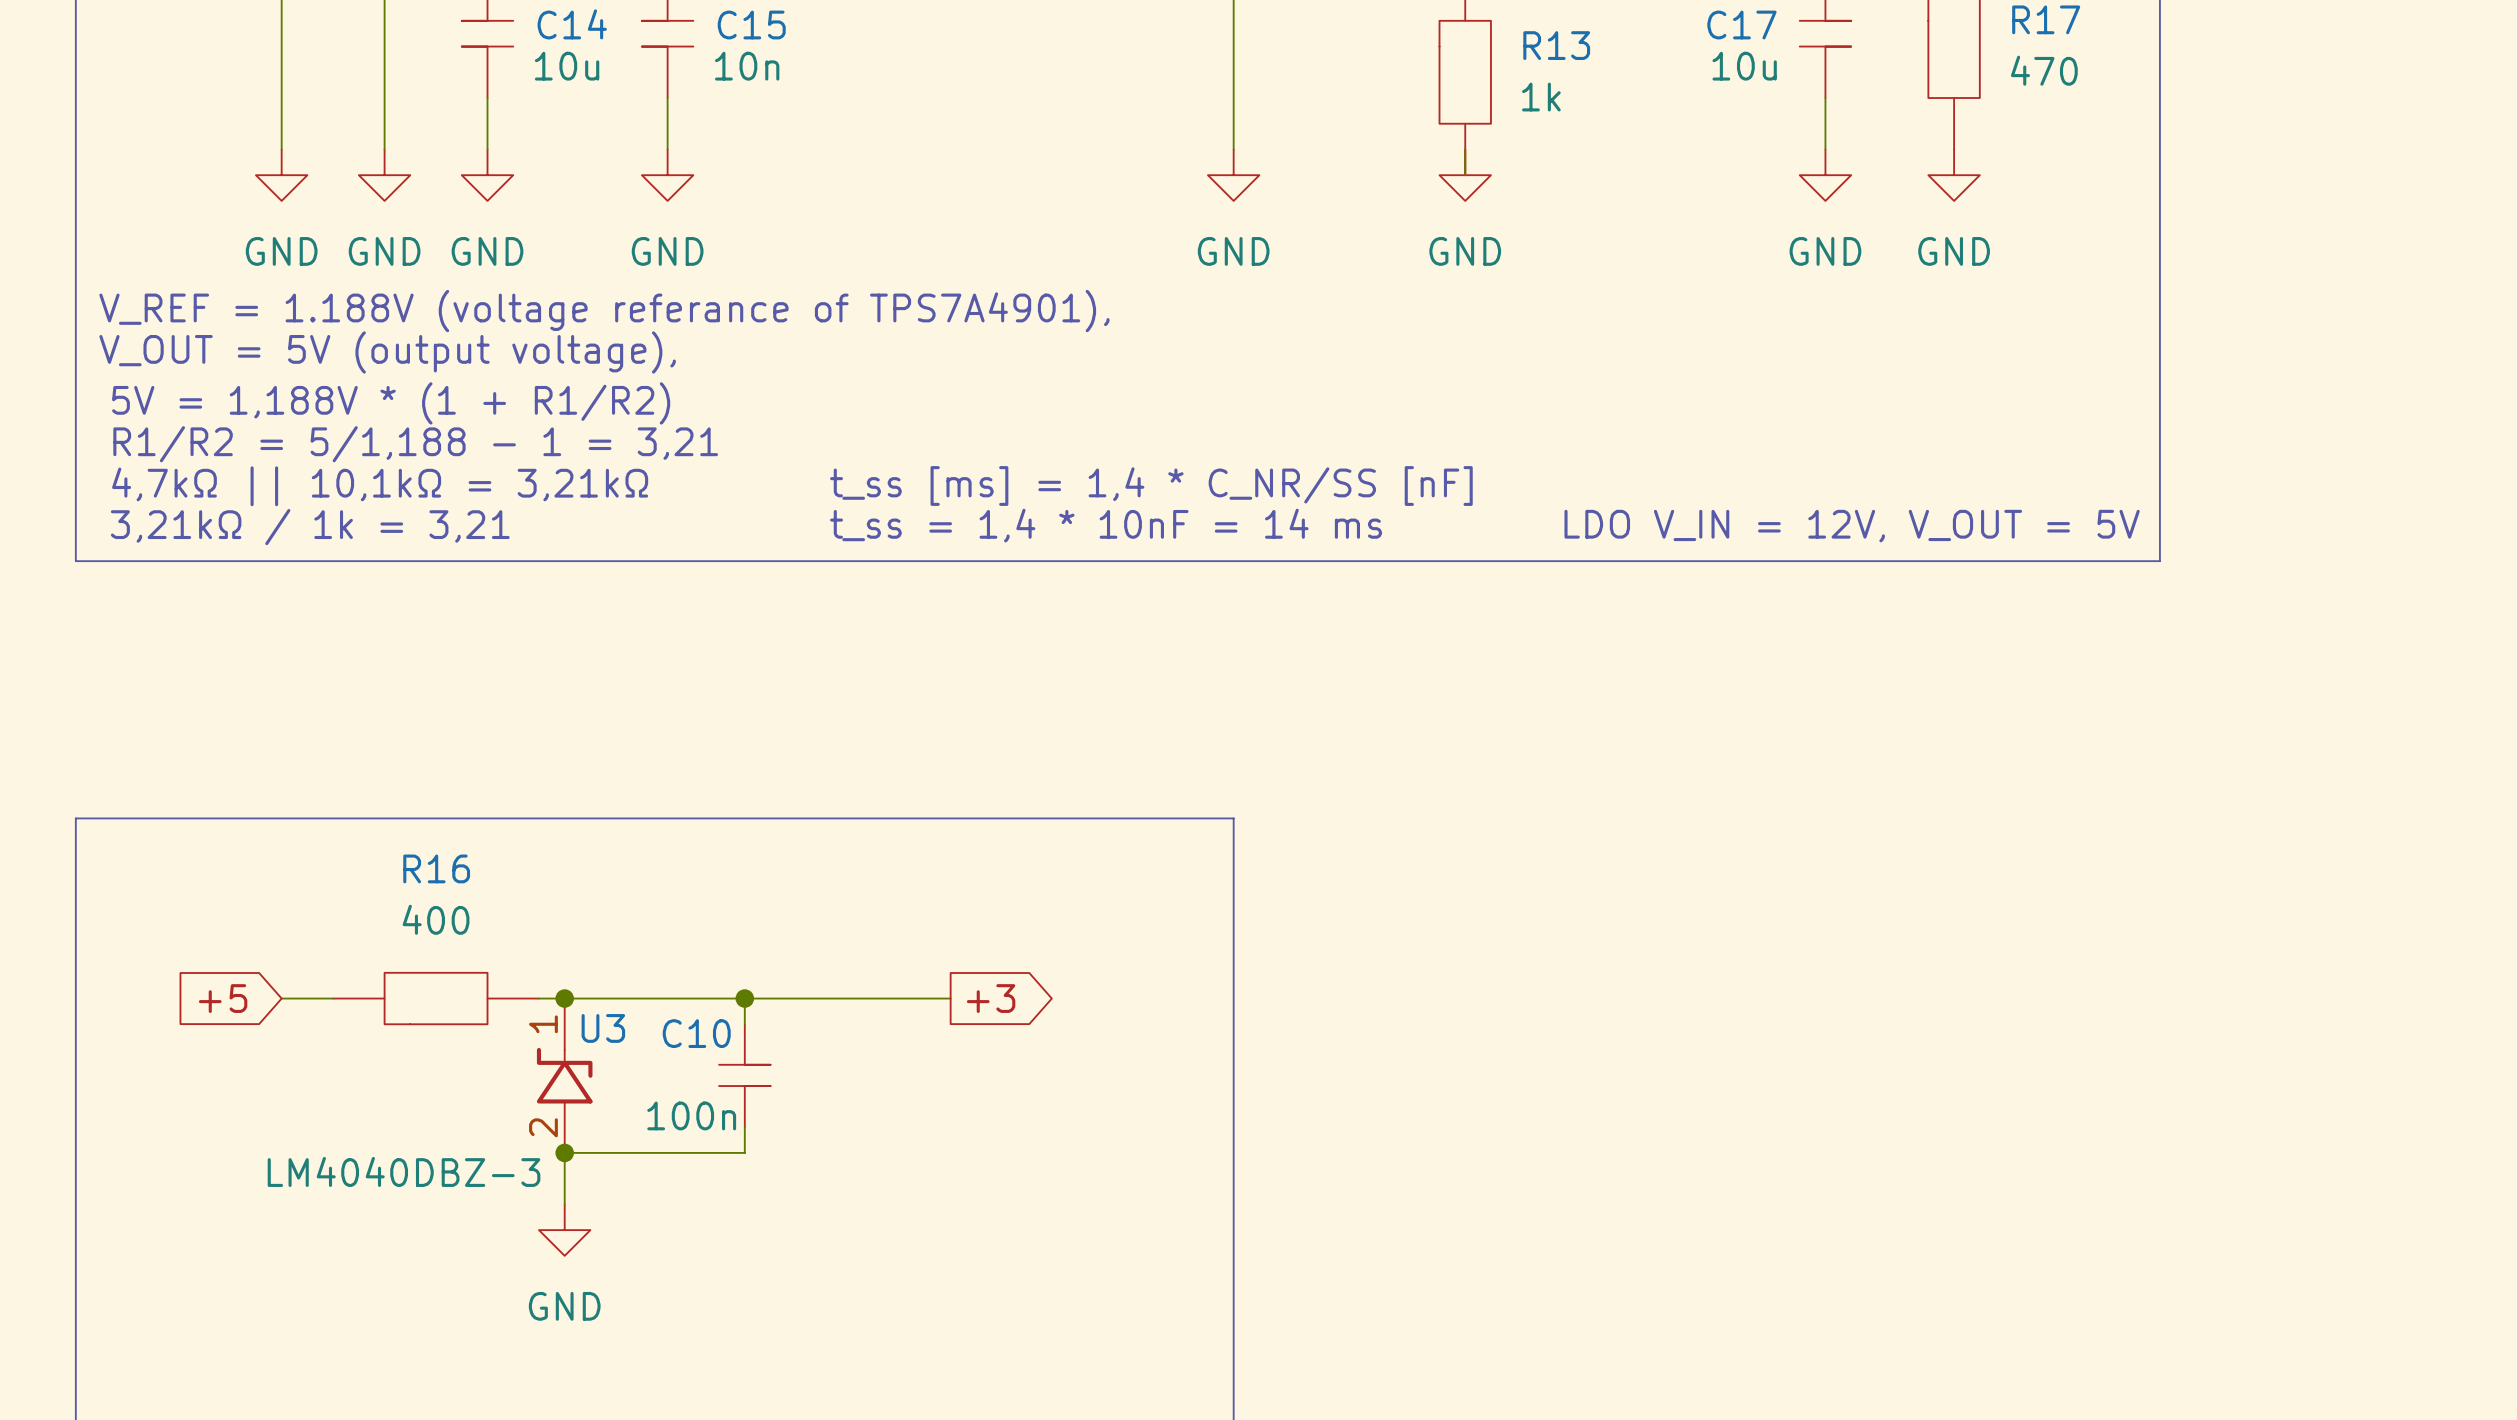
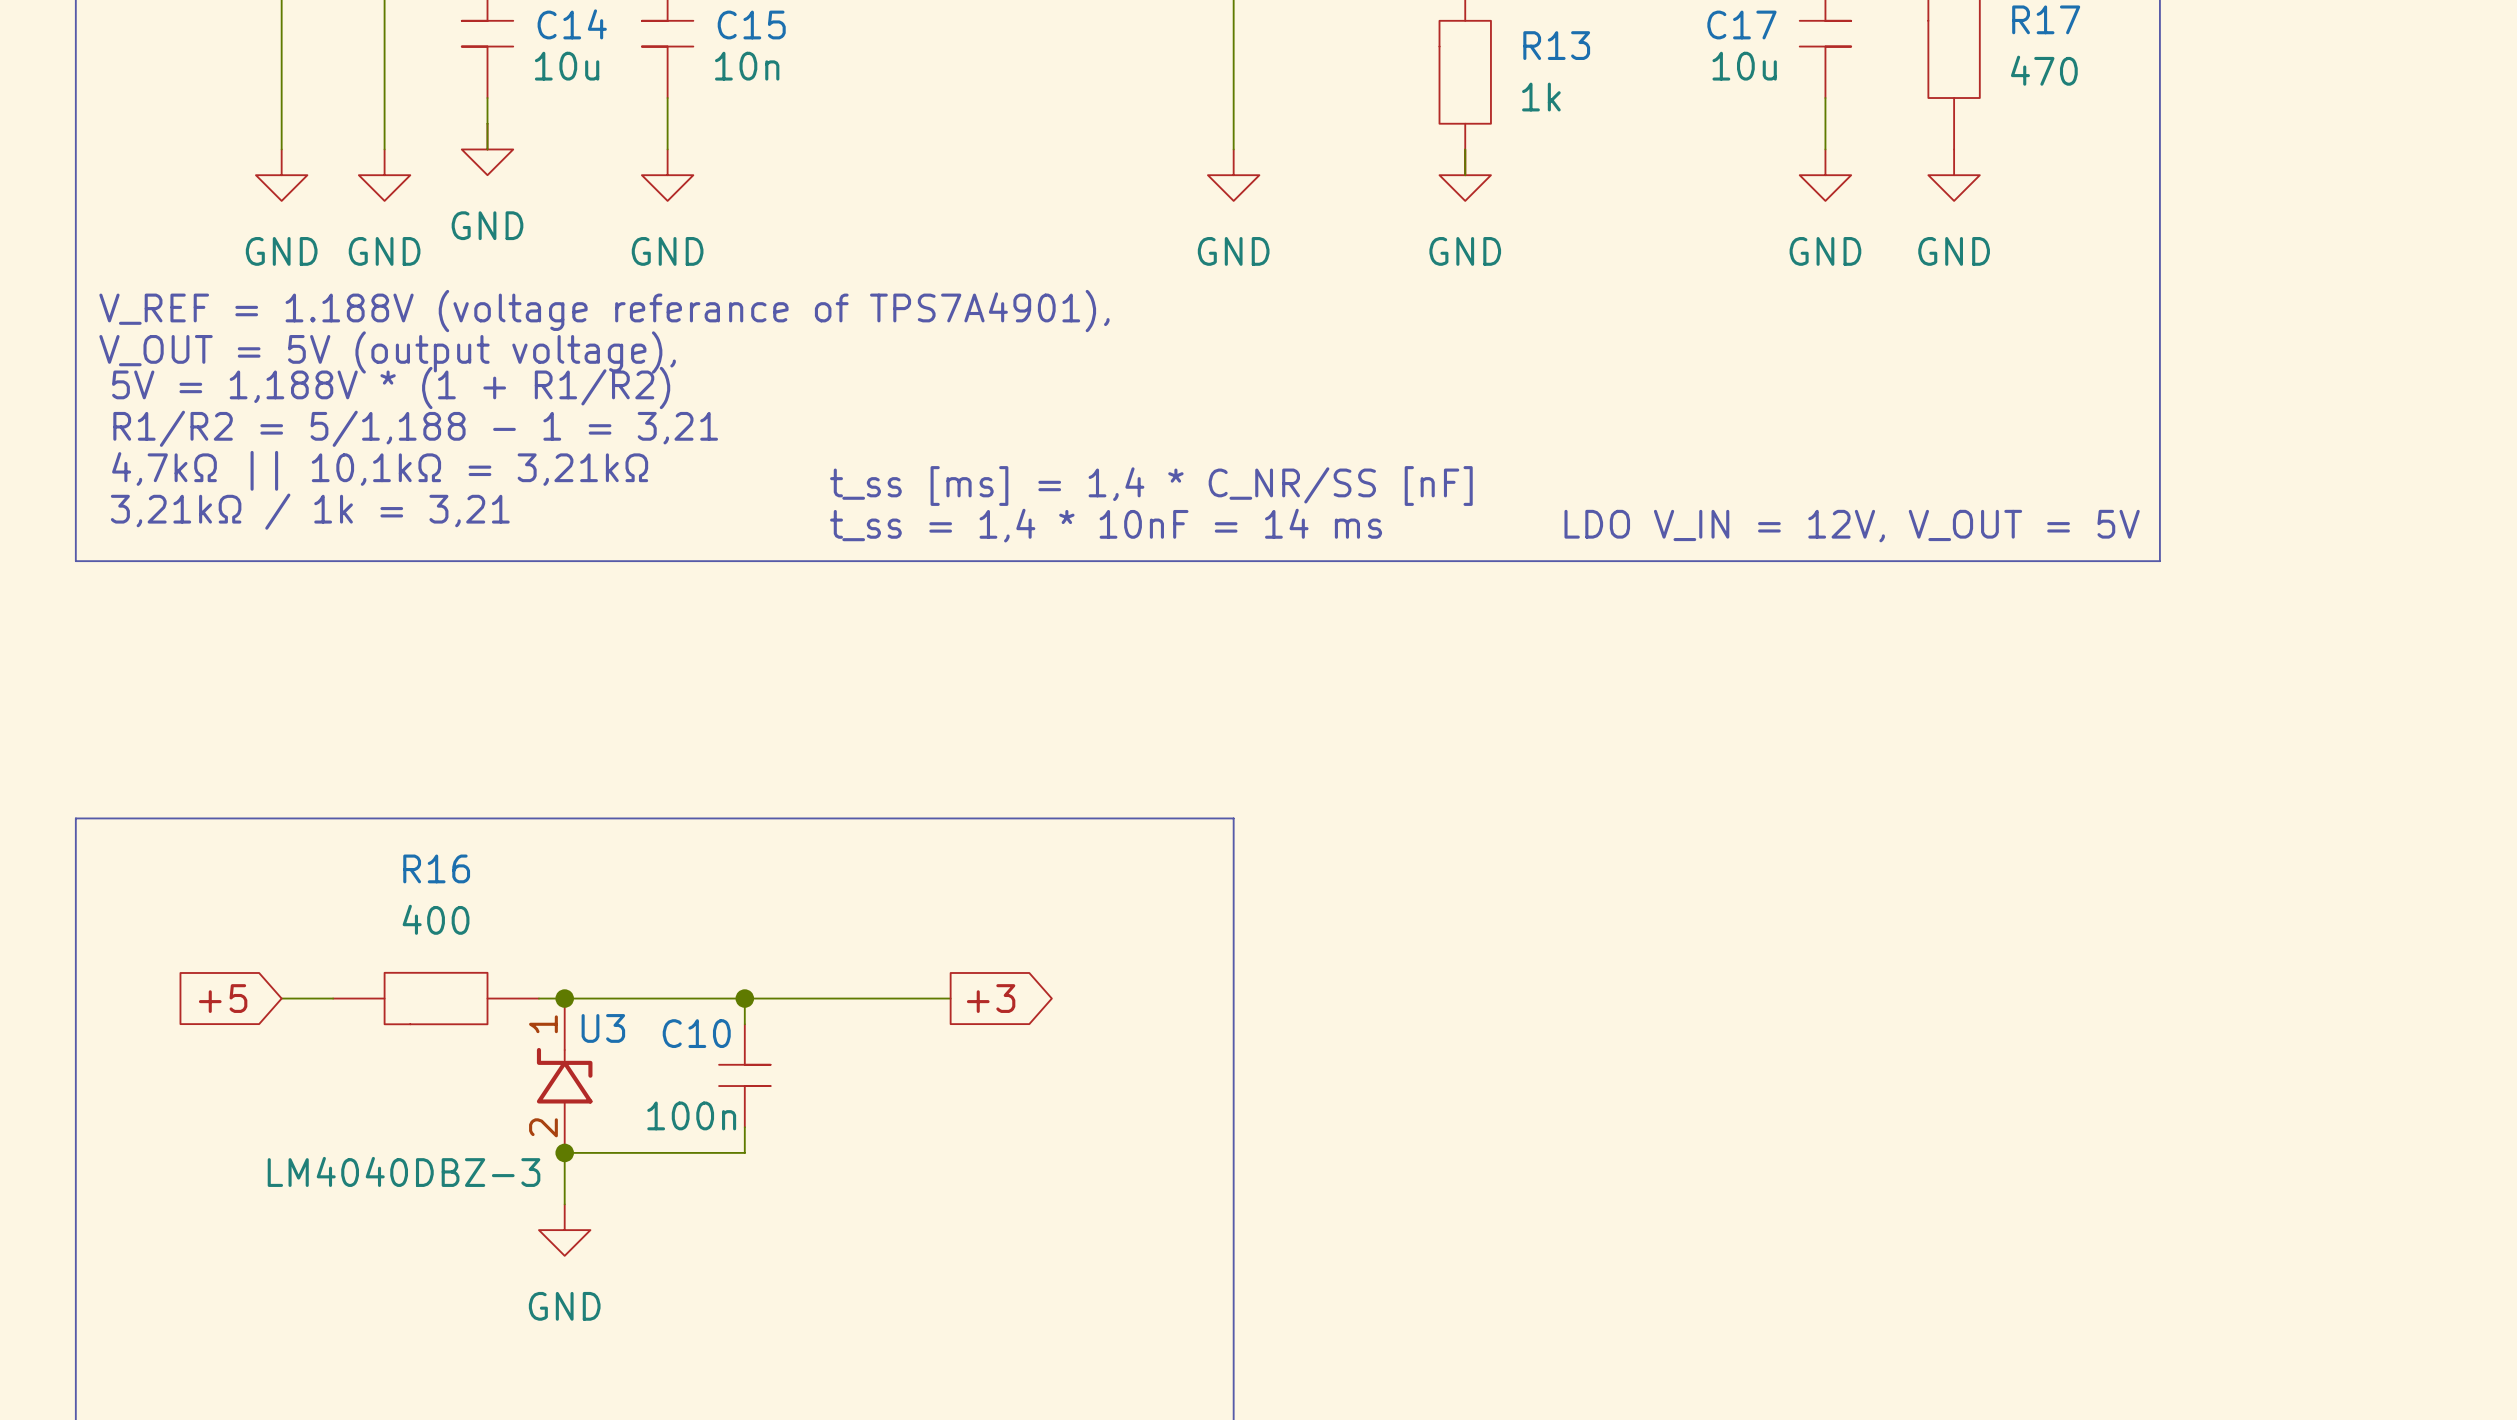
power symbol position: GND (487, 175) -> GND (487, 149)
text position: 5V = 1,188V * (1 + R1/R2) (391, 403) -> 5V = 1,188V * (1 + R1/R2) (391, 387)
text position: R1/R2 = 5/1,188 - 1 = 3,21 (415, 444) -> R1/R2 = 5/1,188 - 1 = 3,21 (415, 428)
text position: 4,7kΩ || 10,1kΩ = 3,21kΩ (380, 486) -> 4,7kΩ || 10,1kΩ = 3,21kΩ (380, 470)
text position: 3,21kΩ / 1k = 3,21 (310, 527) -> 3,21kΩ / 1k = 3,21 (310, 511)

